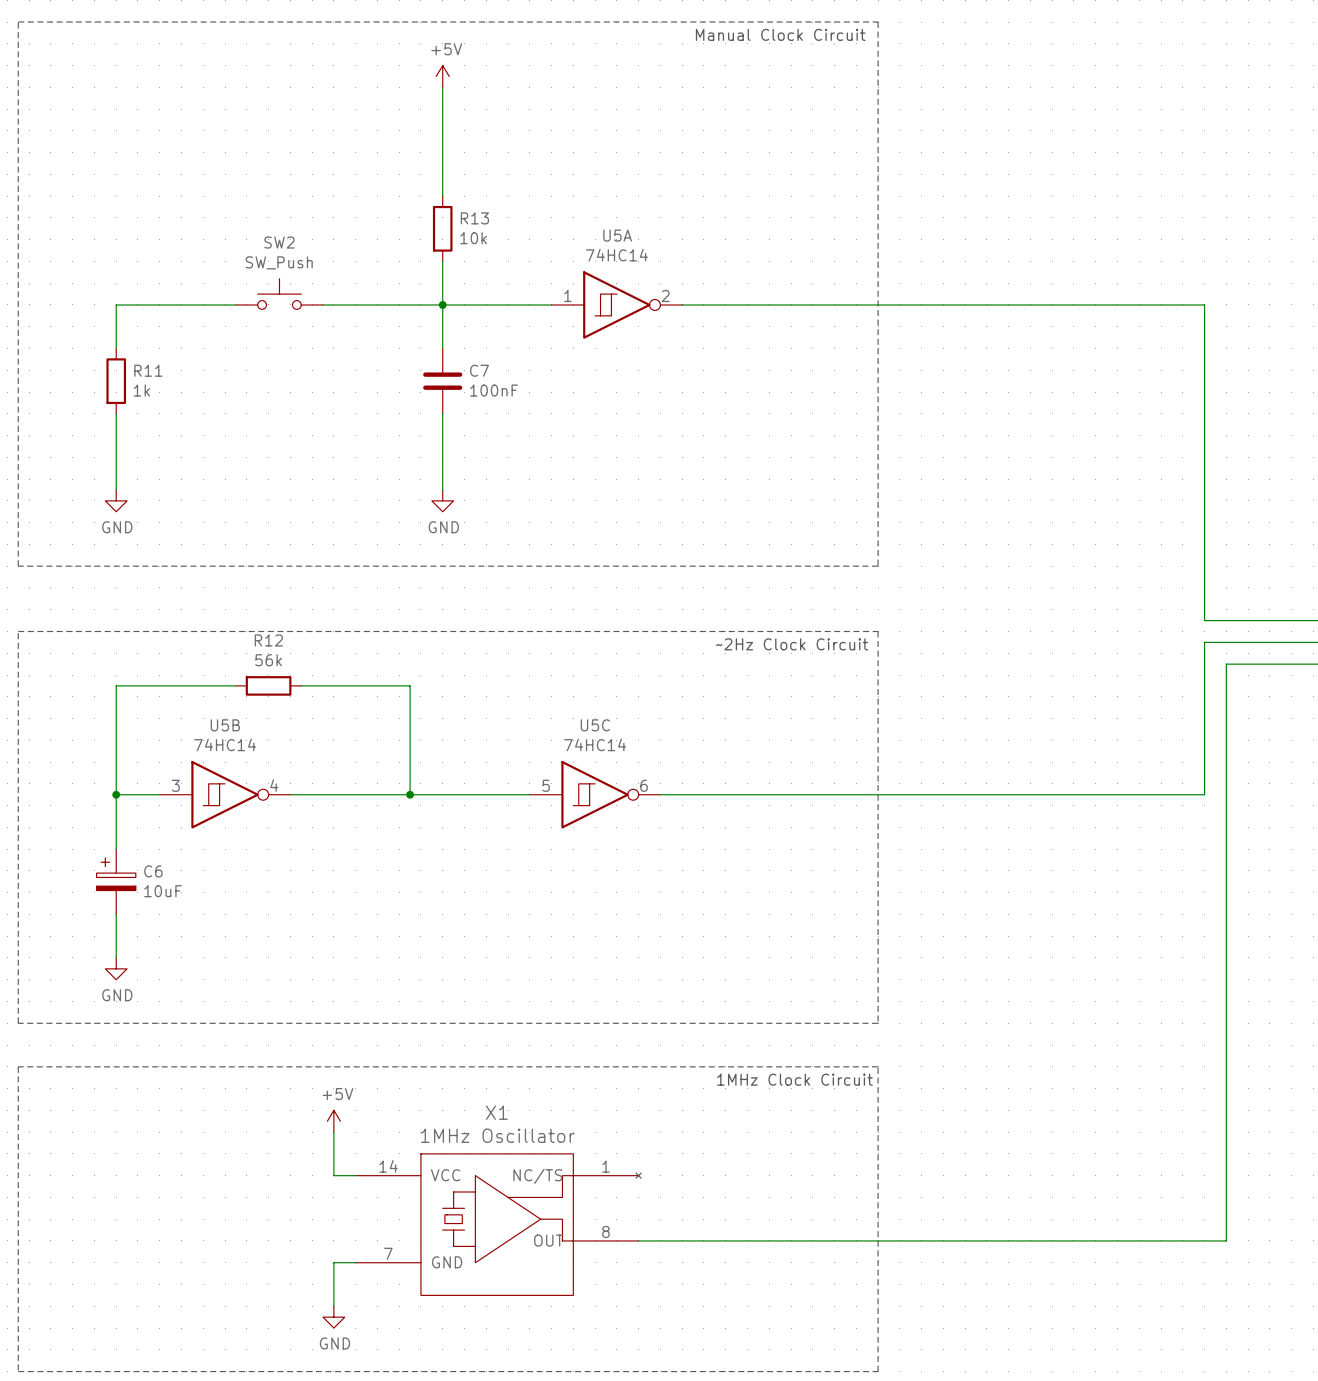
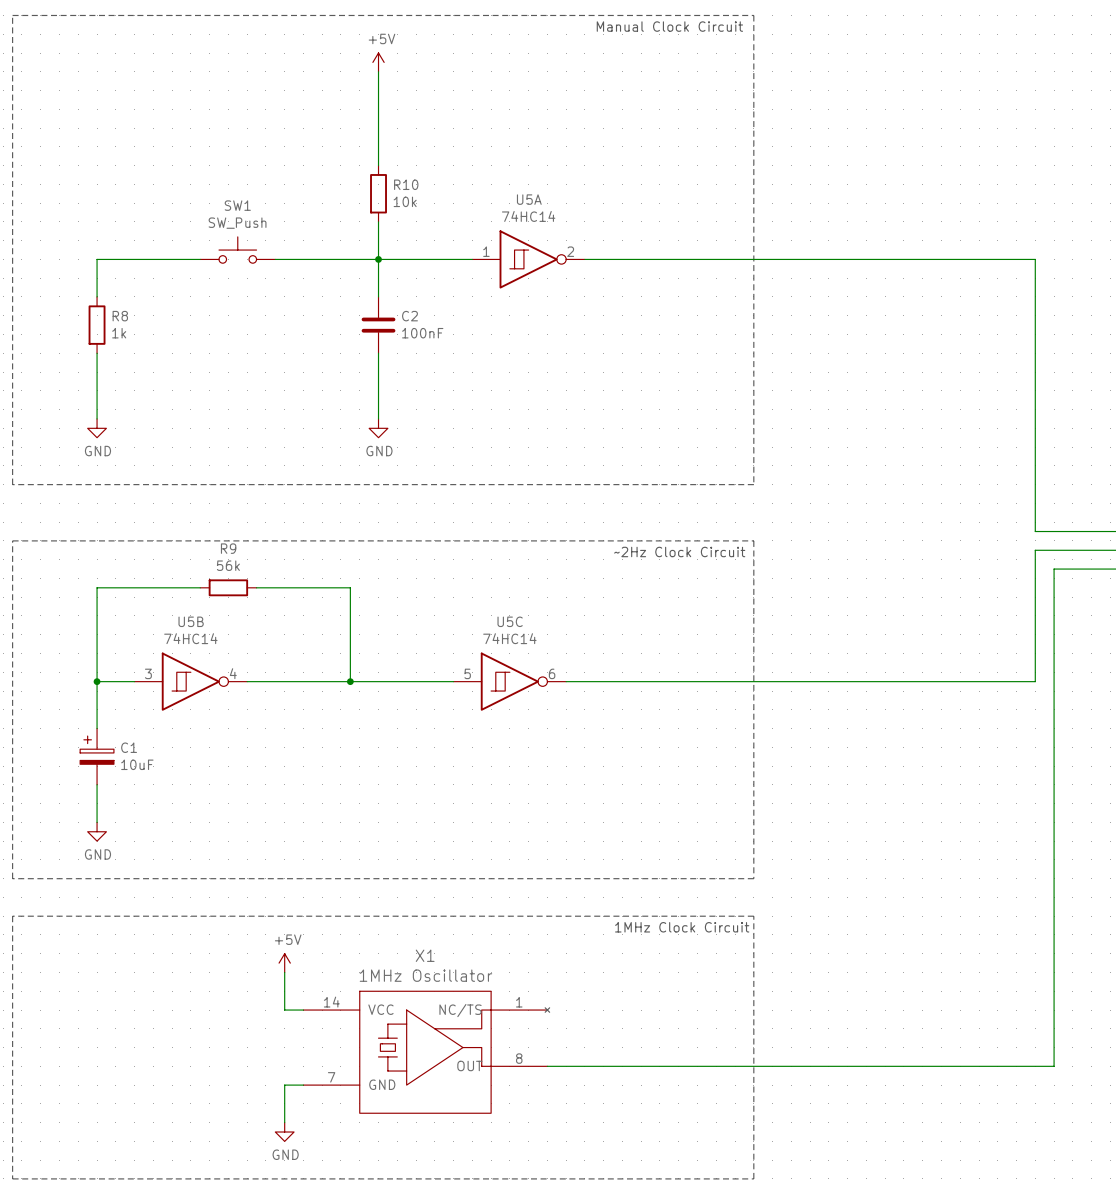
R13 name: R13 (474, 218) -> R10 (406, 184)
SW2 name: SW2 (279, 242) -> SW1 (237, 205)
R11 name: R11 (148, 370) -> R8 (120, 316)
C7 name: C7 (479, 370) -> C2 (409, 316)
R12 name: R12 (268, 640) -> R9 (228, 548)
C6 name: C6 (153, 871) -> C1 (129, 747)

